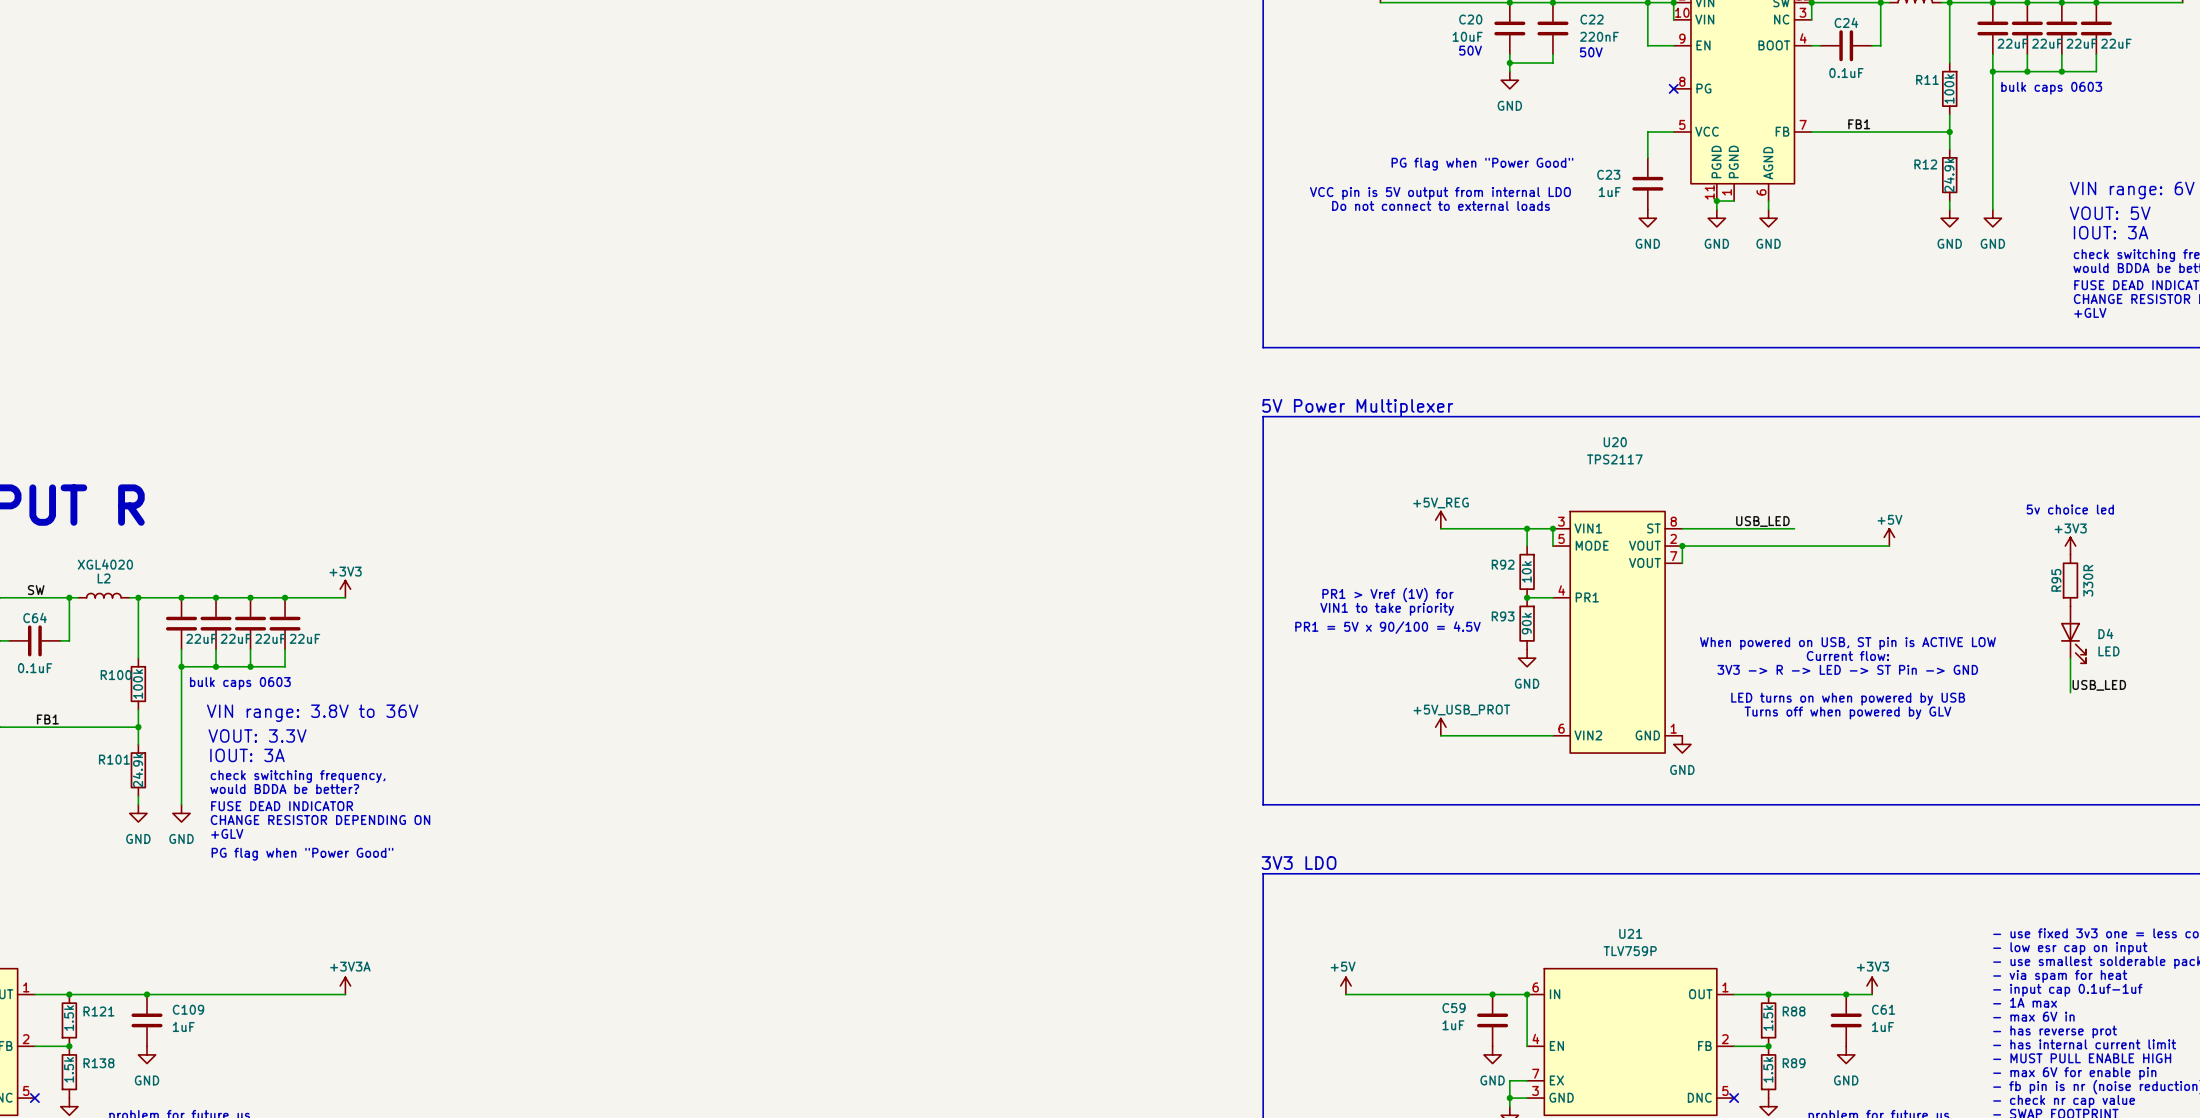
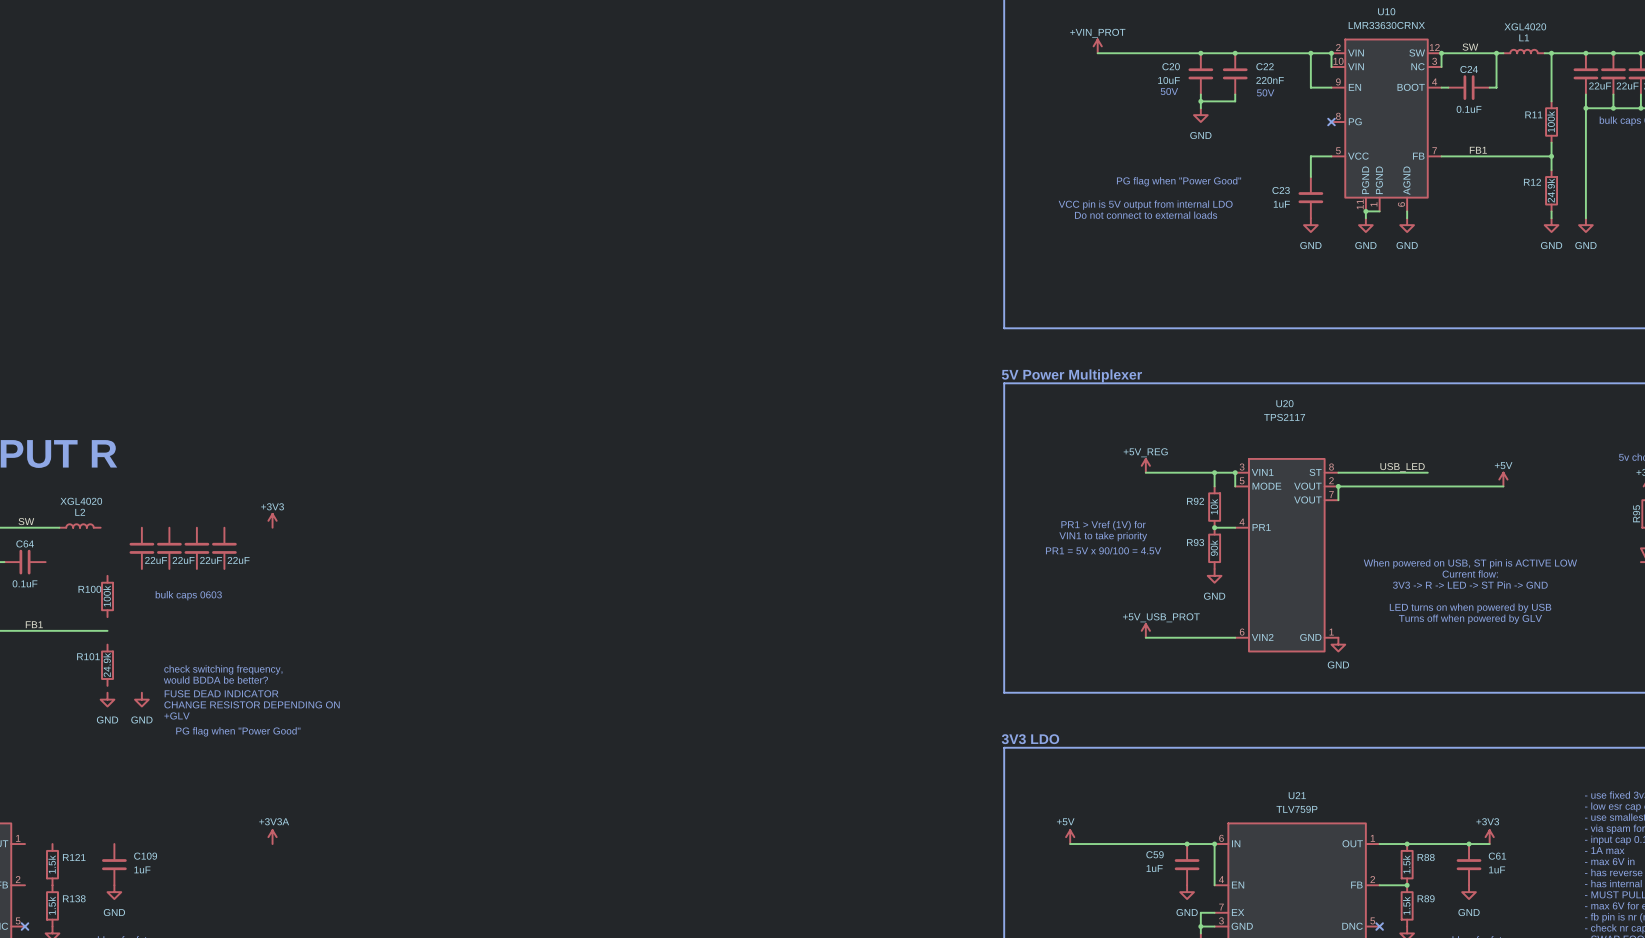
wire: (69, 597) (69, 640) (60, 640) -> none
junction: (69, 597) -> none
wire: (129, 597) (345, 597) -> none
wire: (138, 597) (138, 658) -> none
junction: (138, 597) -> none
junction: (181, 597) -> none
junction: (216, 597) -> none
junction: (250, 597) -> none
junction: (285, 597) -> none
wire: (181, 649) (181, 804) -> none
wire: (216, 649) (216, 666) -> none
wire: (250, 649) (250, 666) -> none
wire: (285, 649) (285, 666) (181, 666) -> none
junction: (181, 666) -> none
junction: (216, 666) -> none
junction: (250, 666) -> none
wire: (138, 709) (138, 744) -> none
text: VIN range: 3.8V to 36V (312, 713) -> none
junction: (138, 727) -> none
text: VOUT: 3.3V (257, 735) -> none
text: IOUT: 3A (247, 755) -> none
wire: (138, 796) (138, 804) -> none
wire: (34, 994) (345, 994) -> none
junction: (69, 994) -> none
junction: (147, 994) -> none
wire: (34, 1046) (69, 1046) -> none
junction: (69, 1046) -> none

